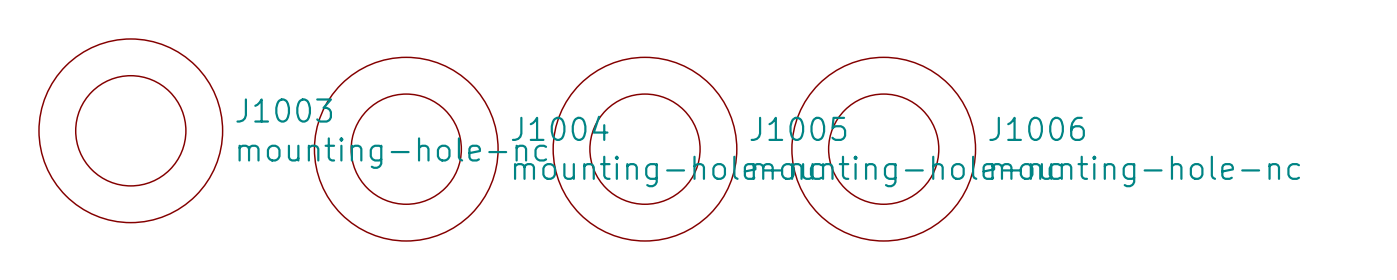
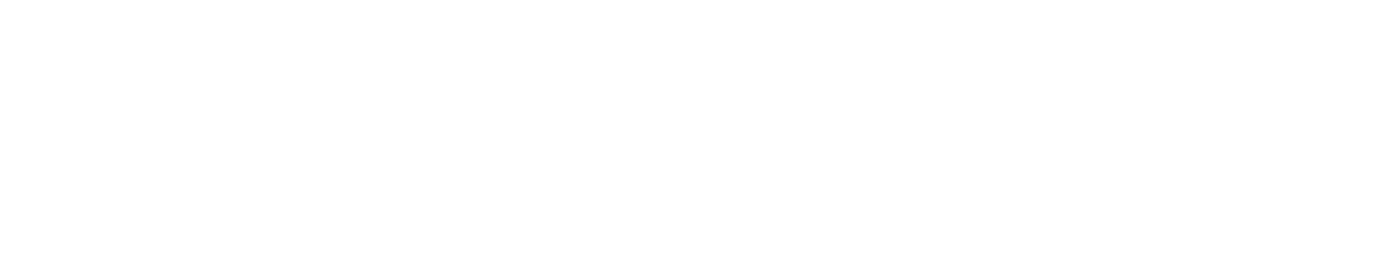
J1003: mounting-hole-nc (130, 130) -> none
J1004: mounting-hole-nc (406, 149) -> none
J1005: mounting-hole-nc (644, 149) -> none
J1006: mounting-hole-nc (883, 149) -> none

